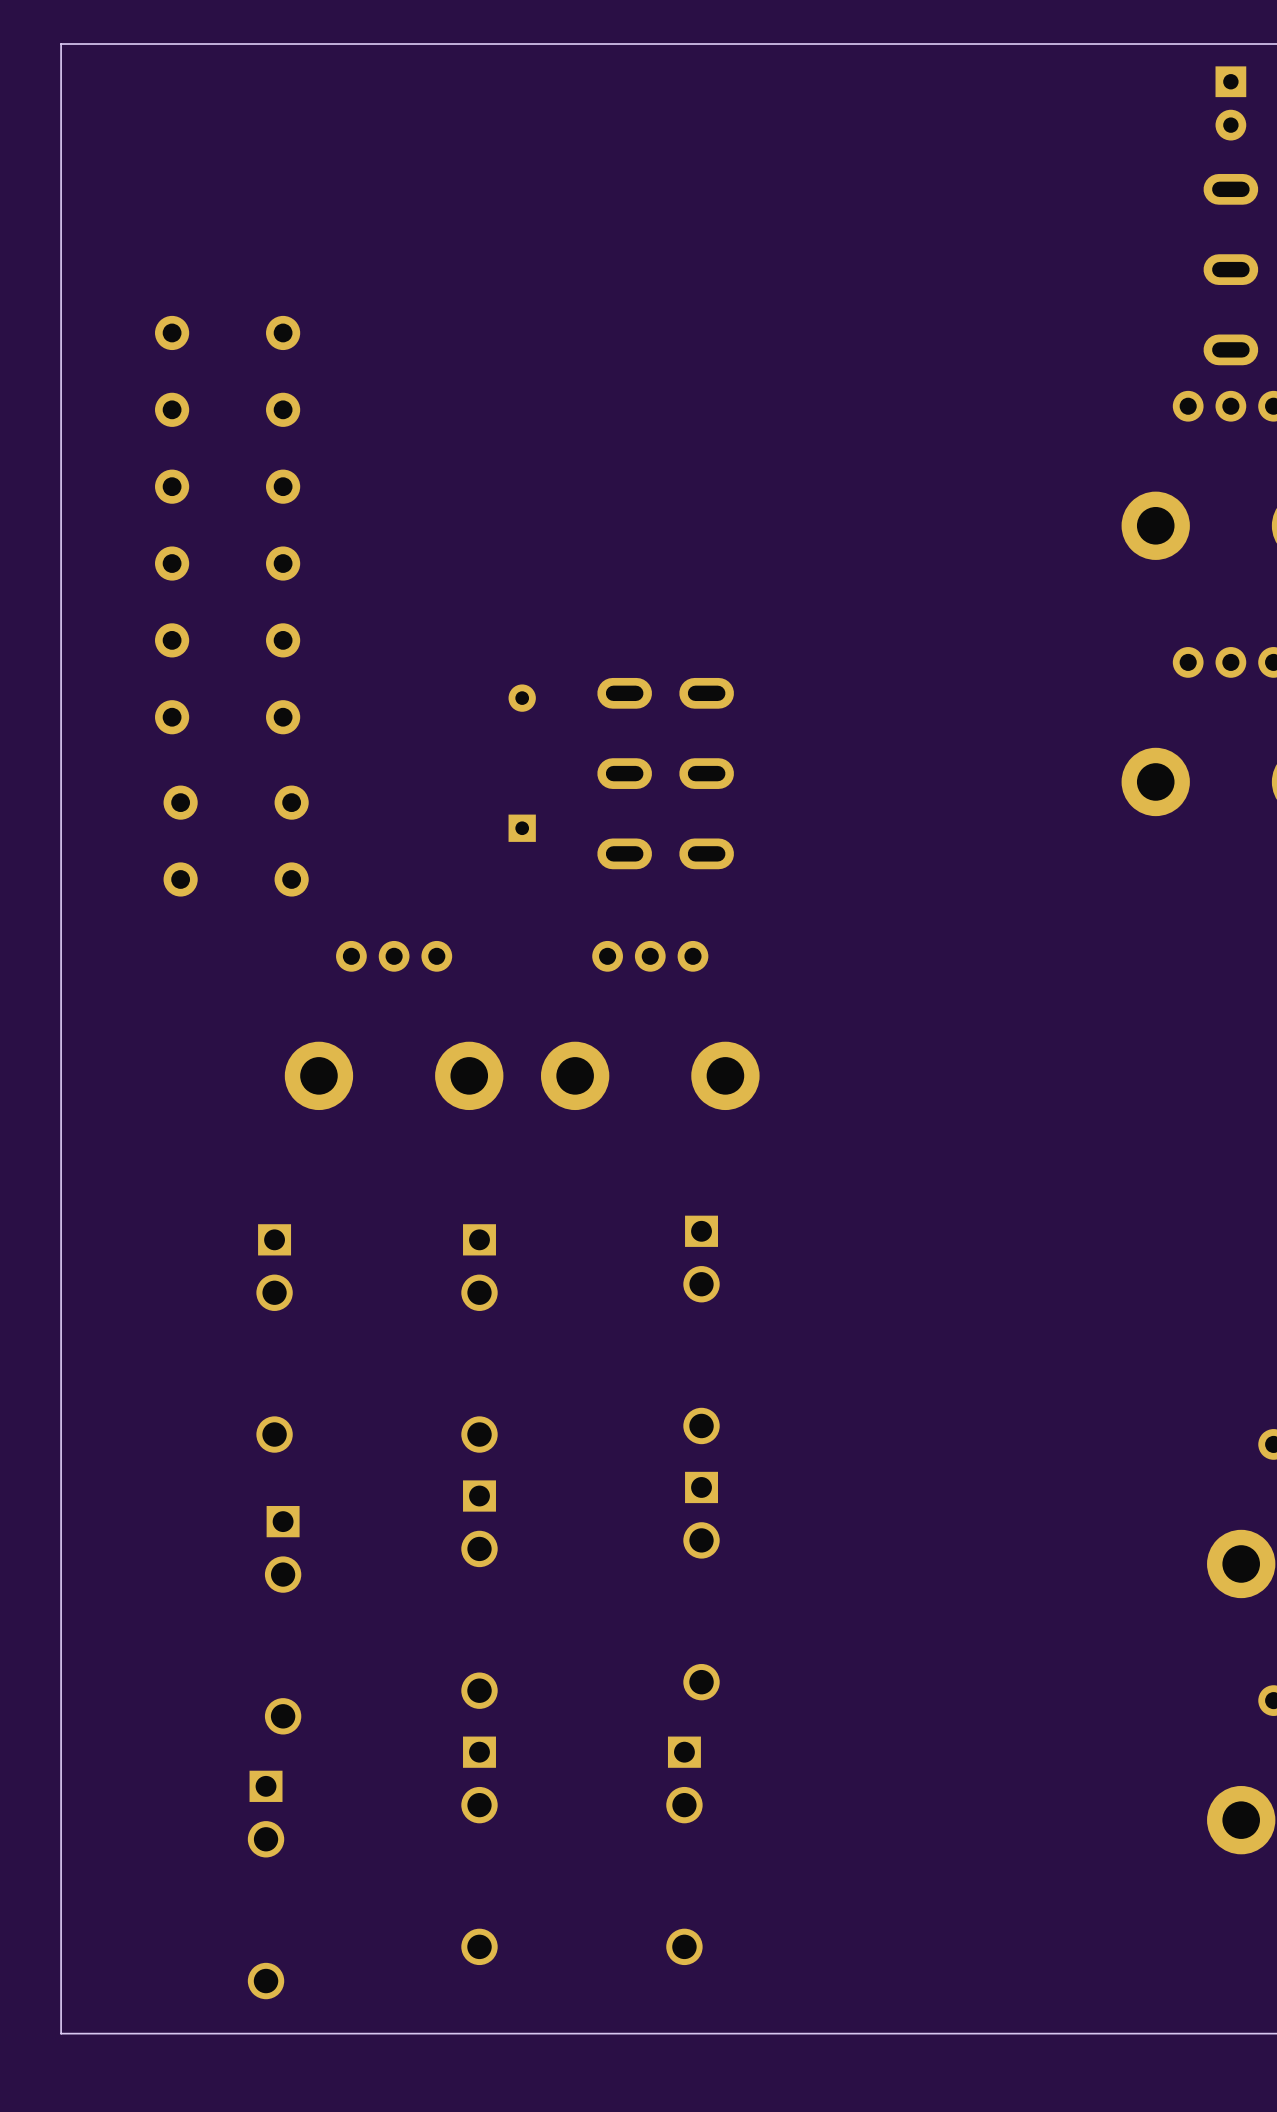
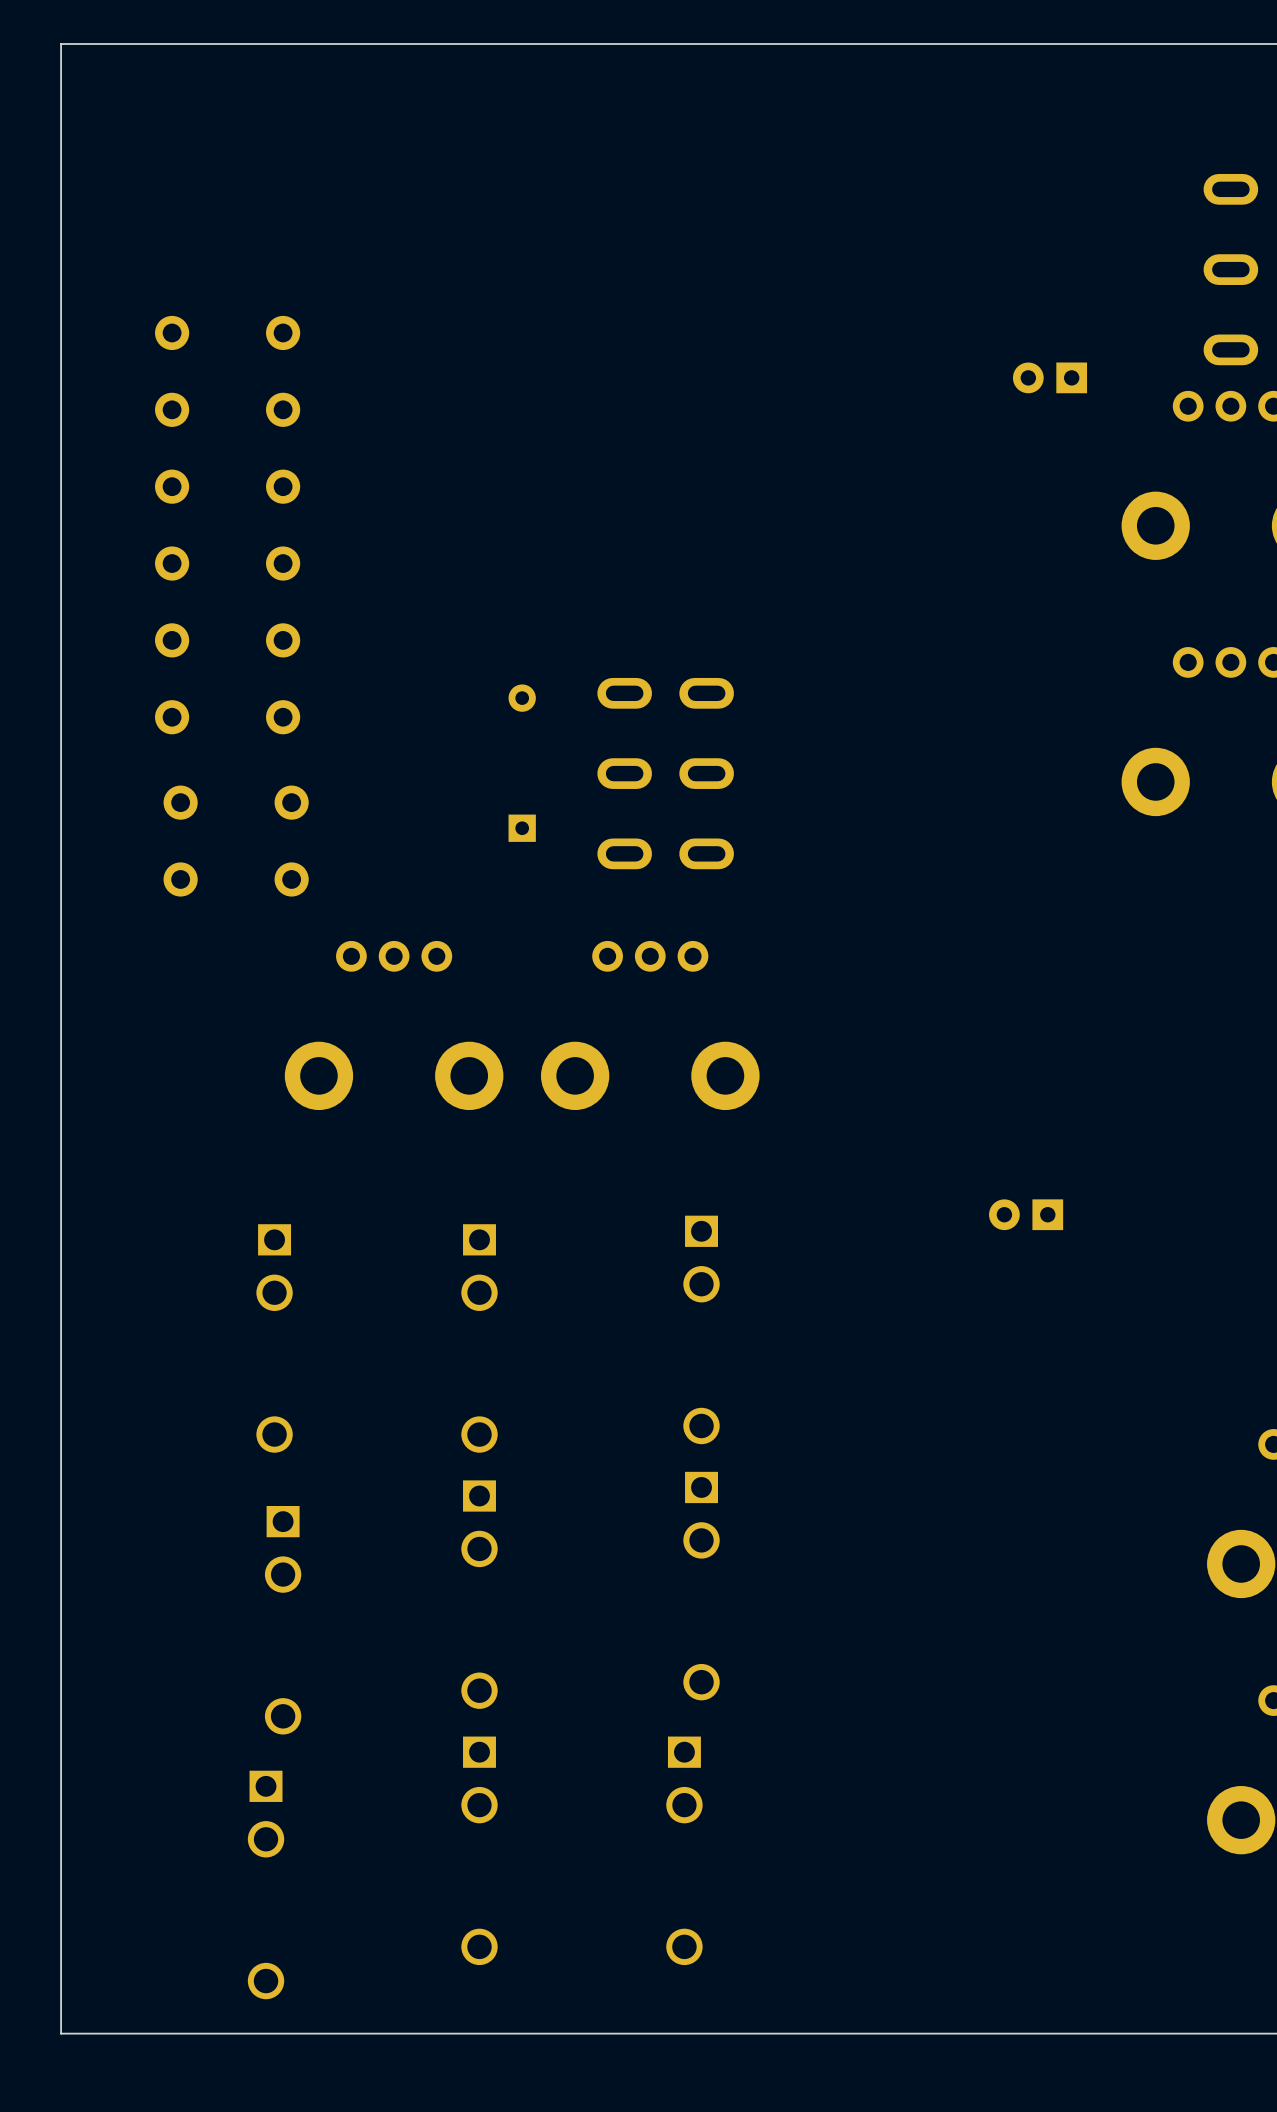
part: (1230, 103) -> none
part: none -> (1050, 377)
part: none -> (1026, 1214)

